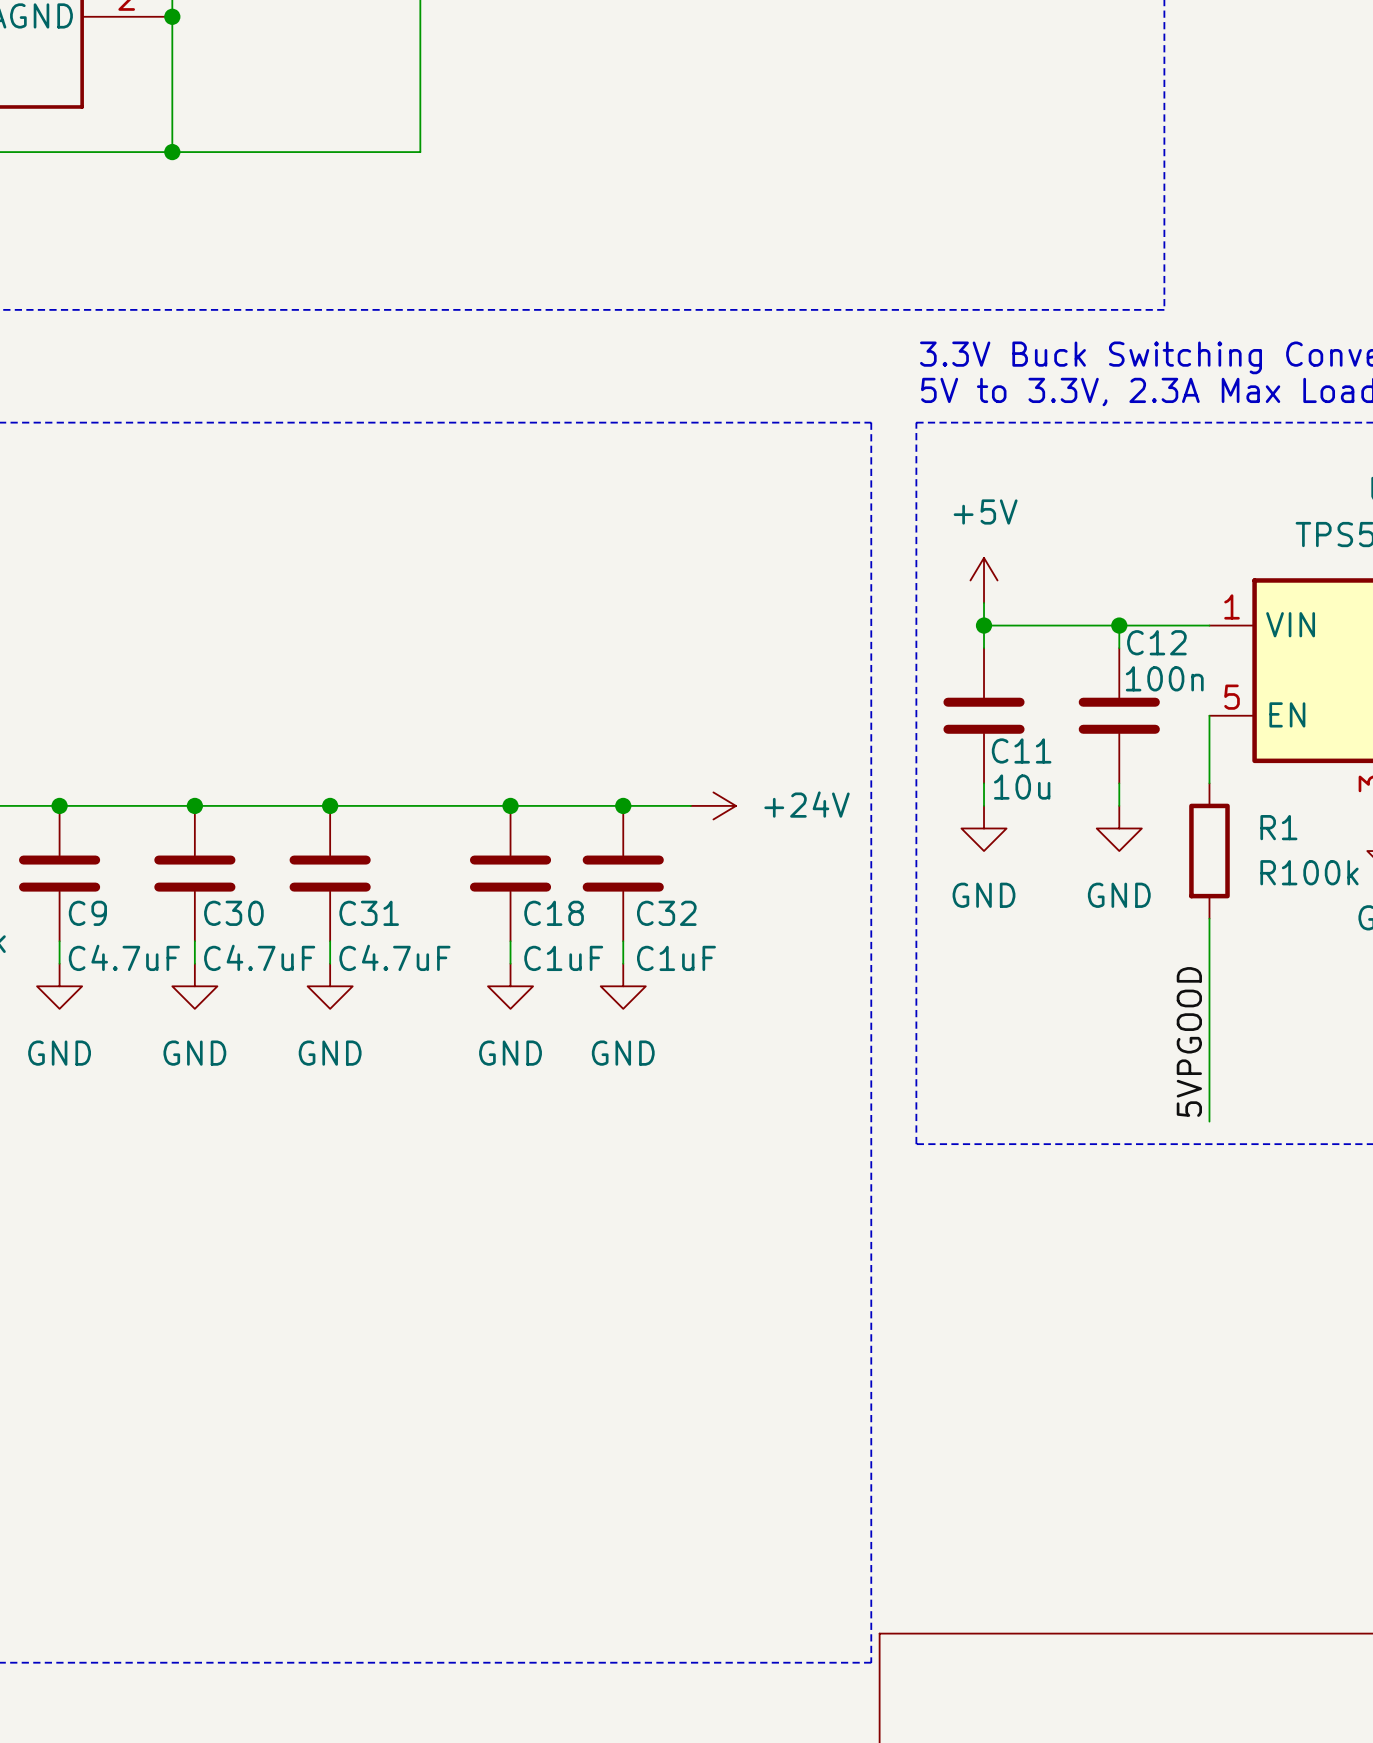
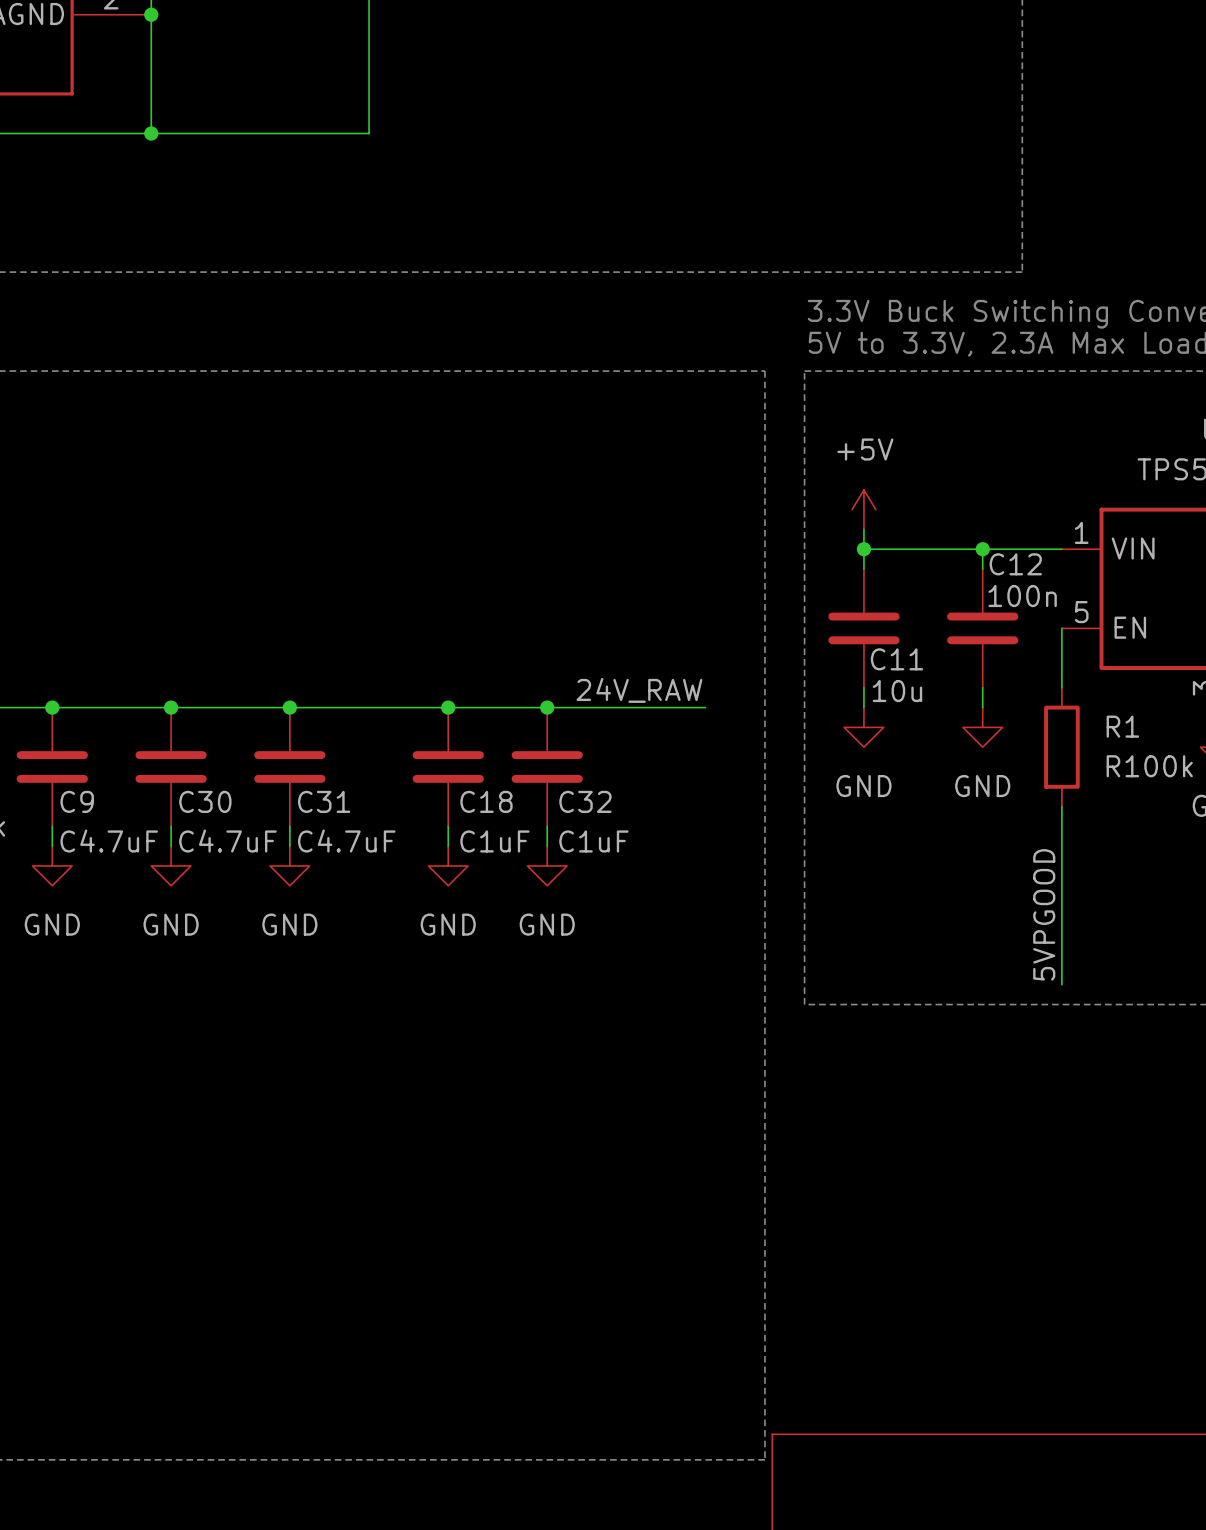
label: none -> 24V_RAW (639, 690)
wire: none -> (606, 707) (705, 707)
power symbol: +24V (713, 805) -> none

